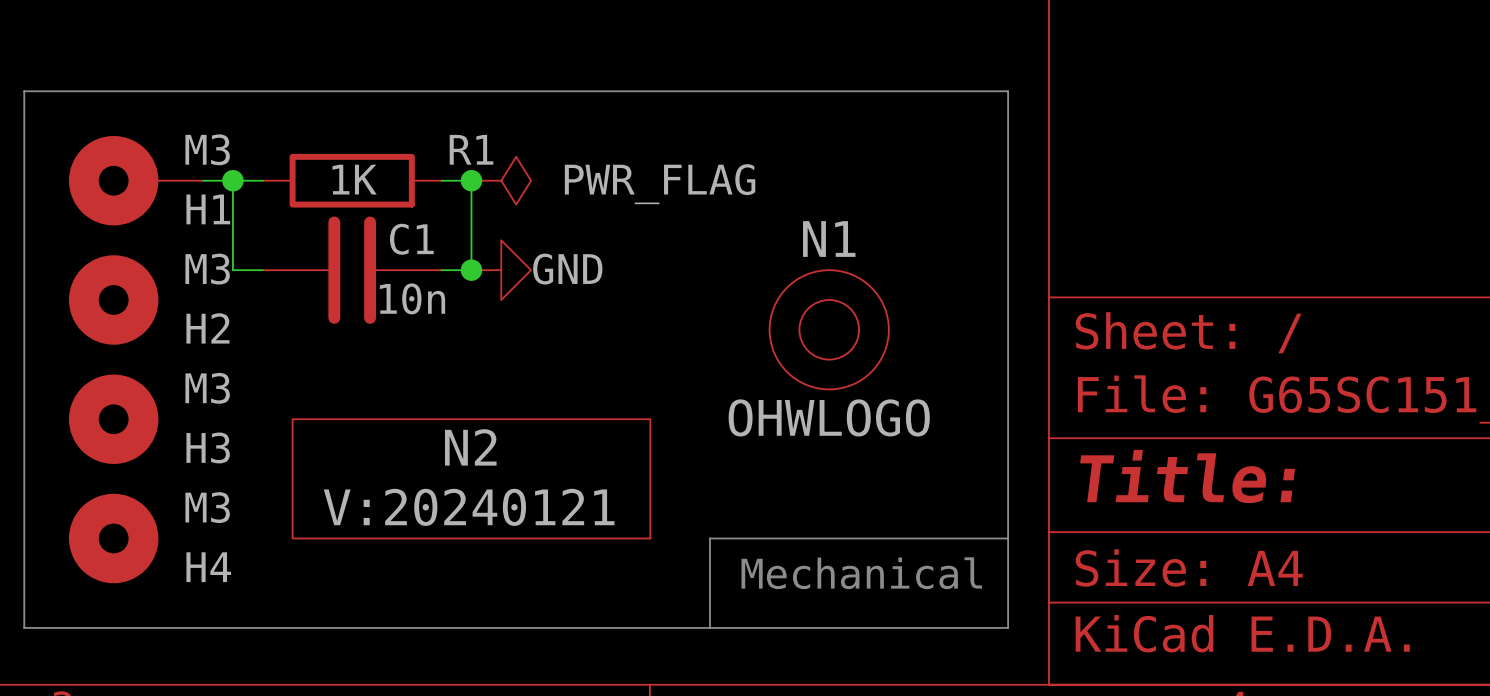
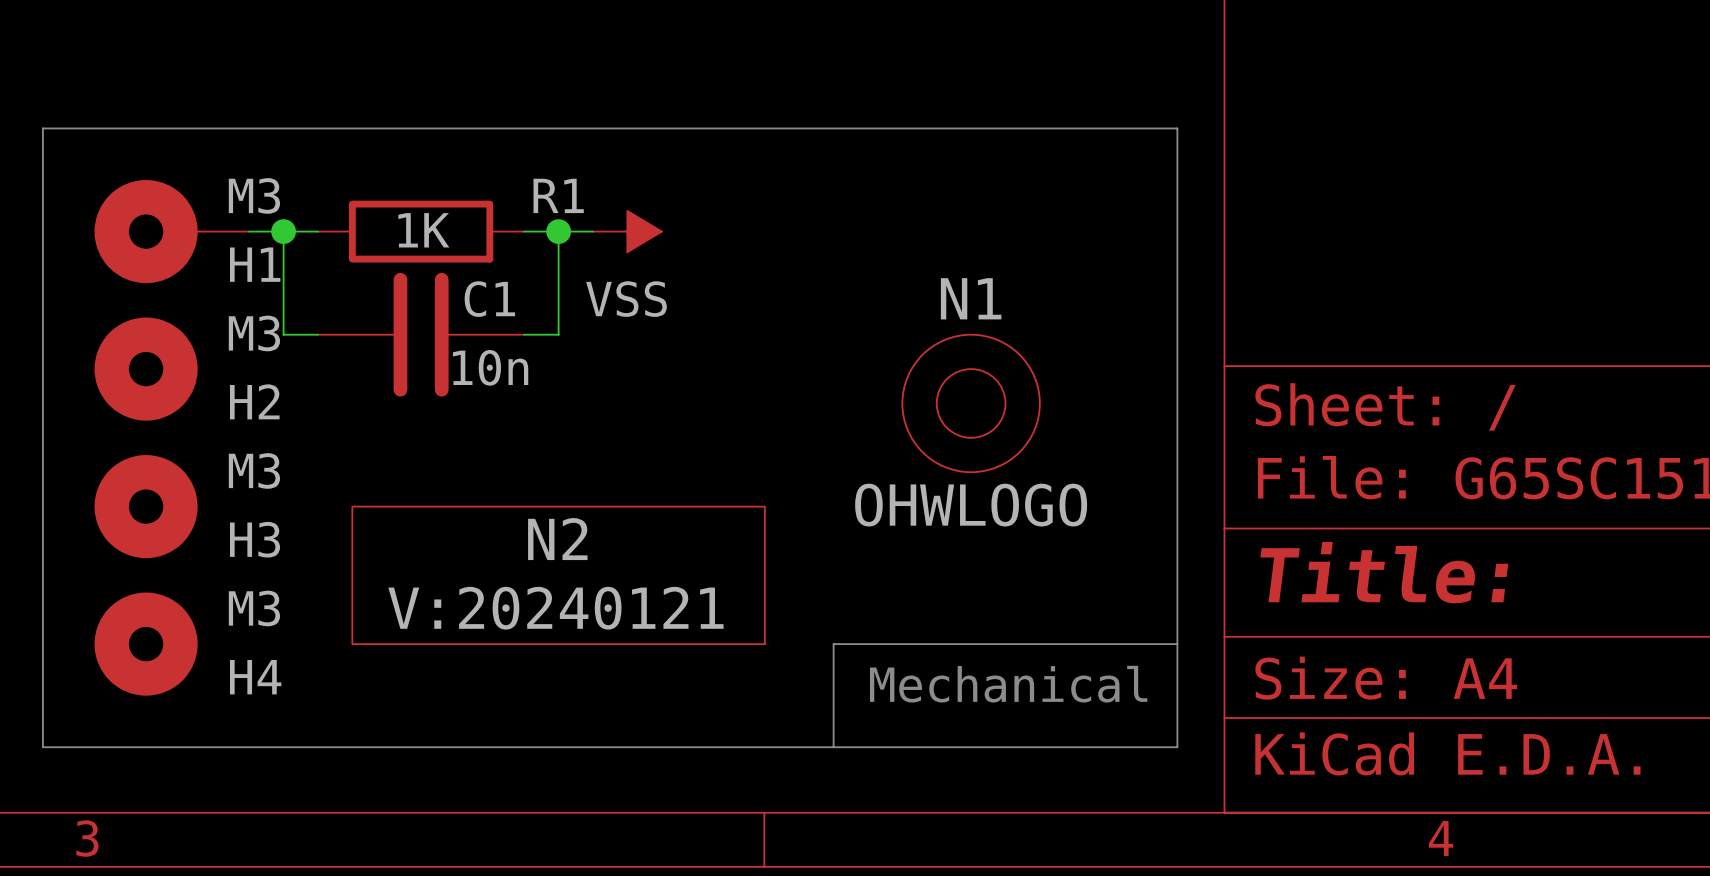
power symbol: PWR_FLAG (501, 180) -> none
power symbol: none -> VSS (627, 231)
junction: (471, 270) -> none
power symbol: GND (501, 270) -> none

